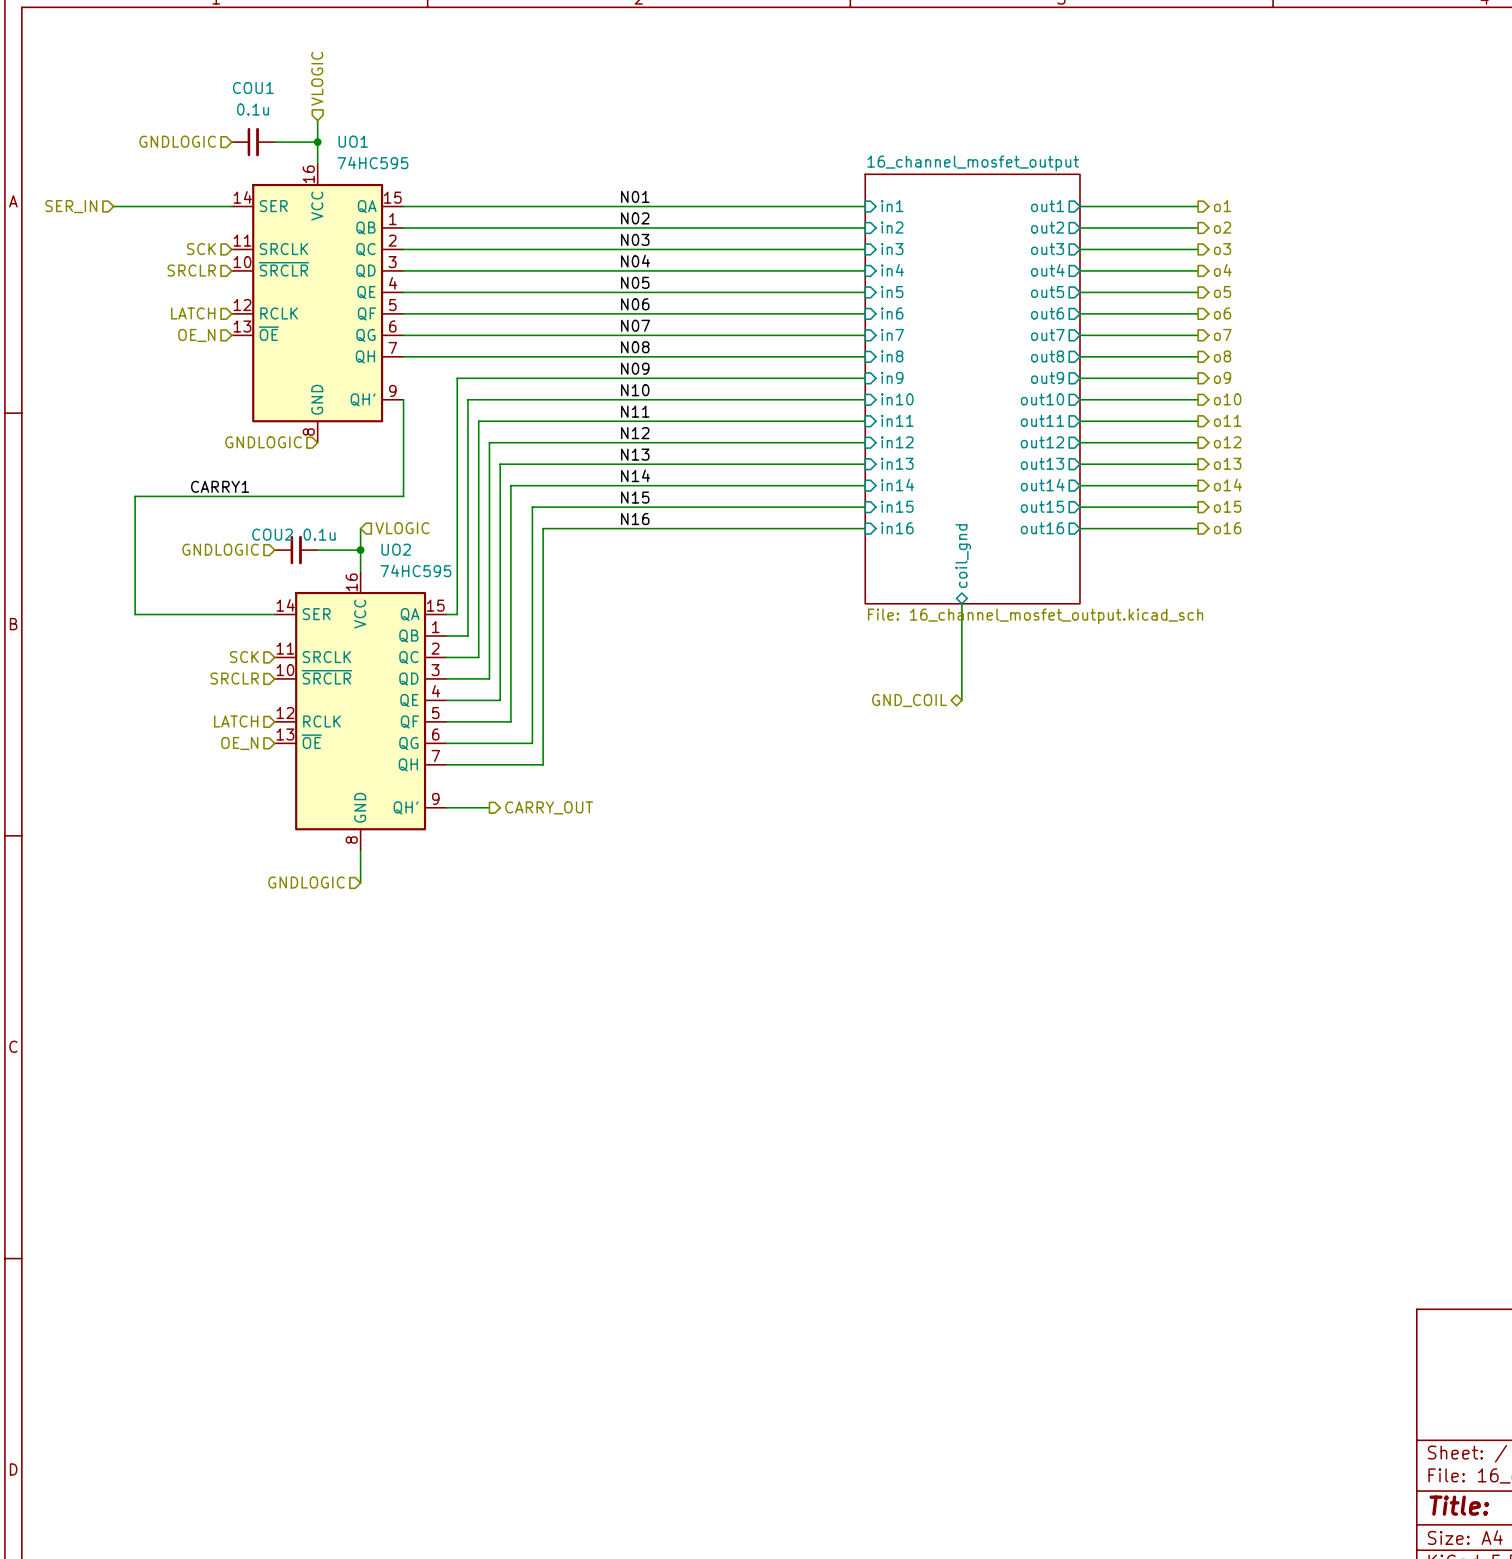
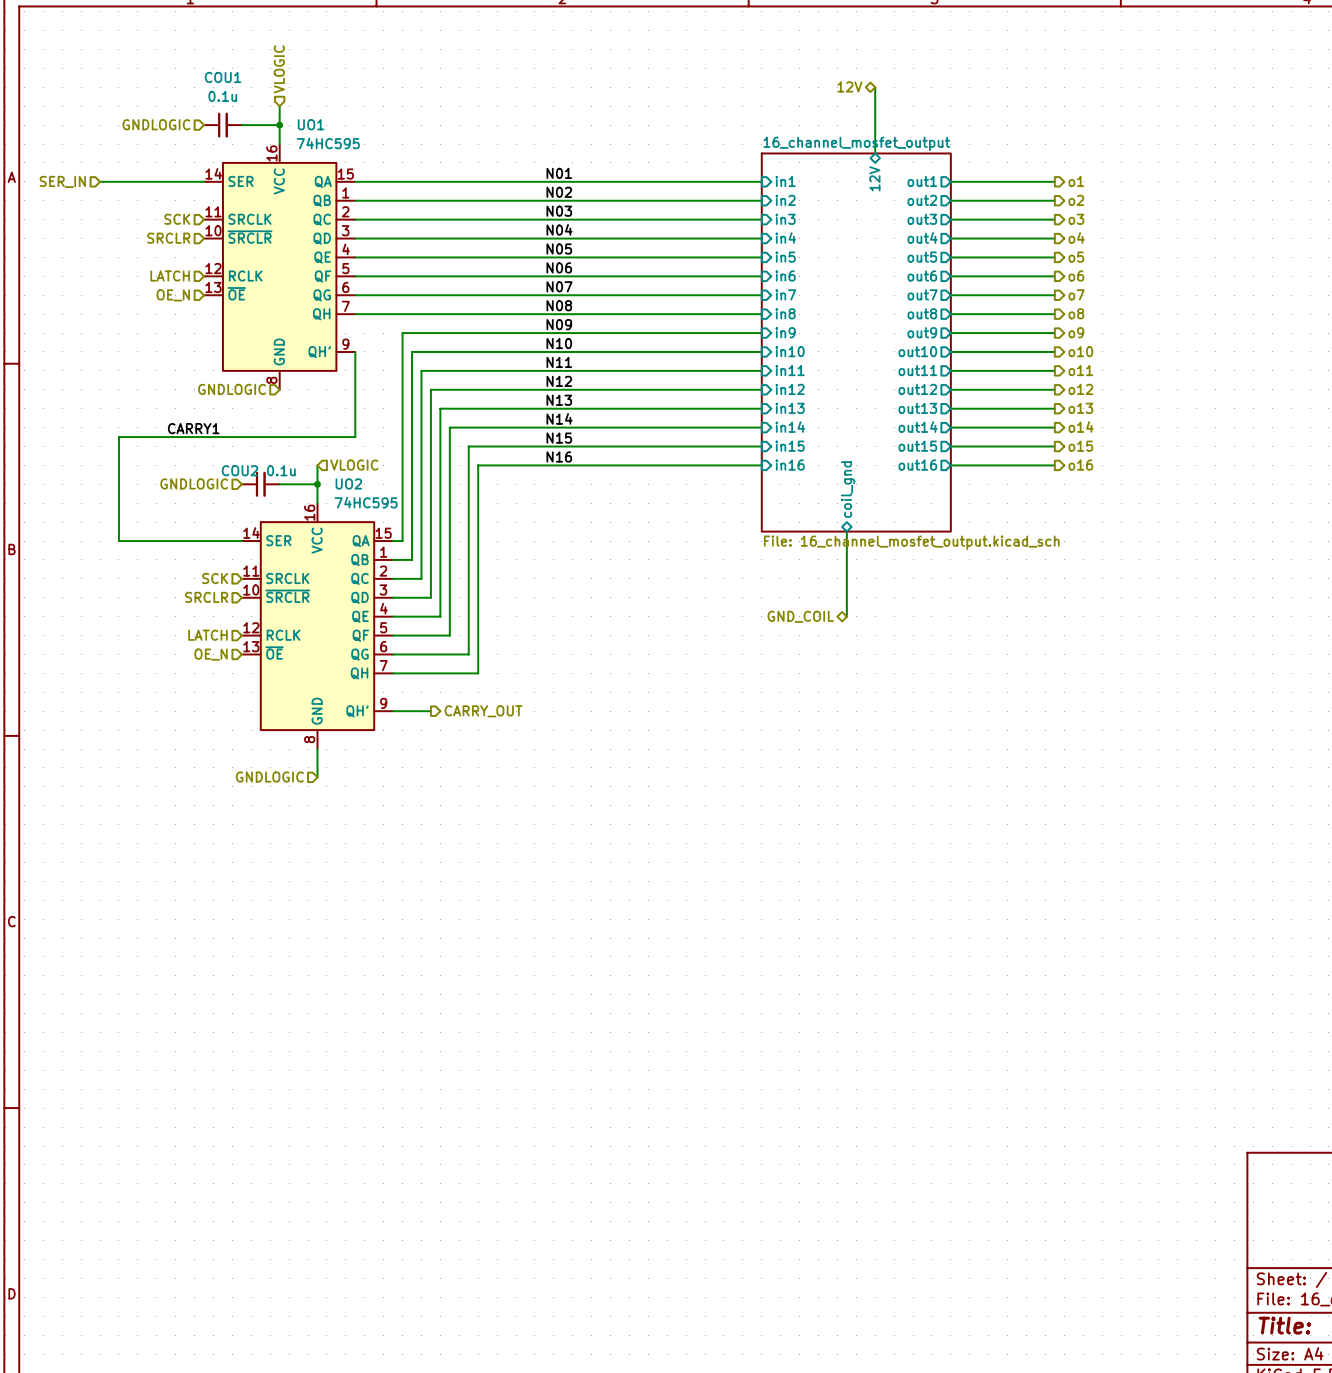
hierarchical label: none -> 12V (849, 86)
wire: none -> (875, 87) (875, 153)
sheet pin: none -> 12V (874, 178)

